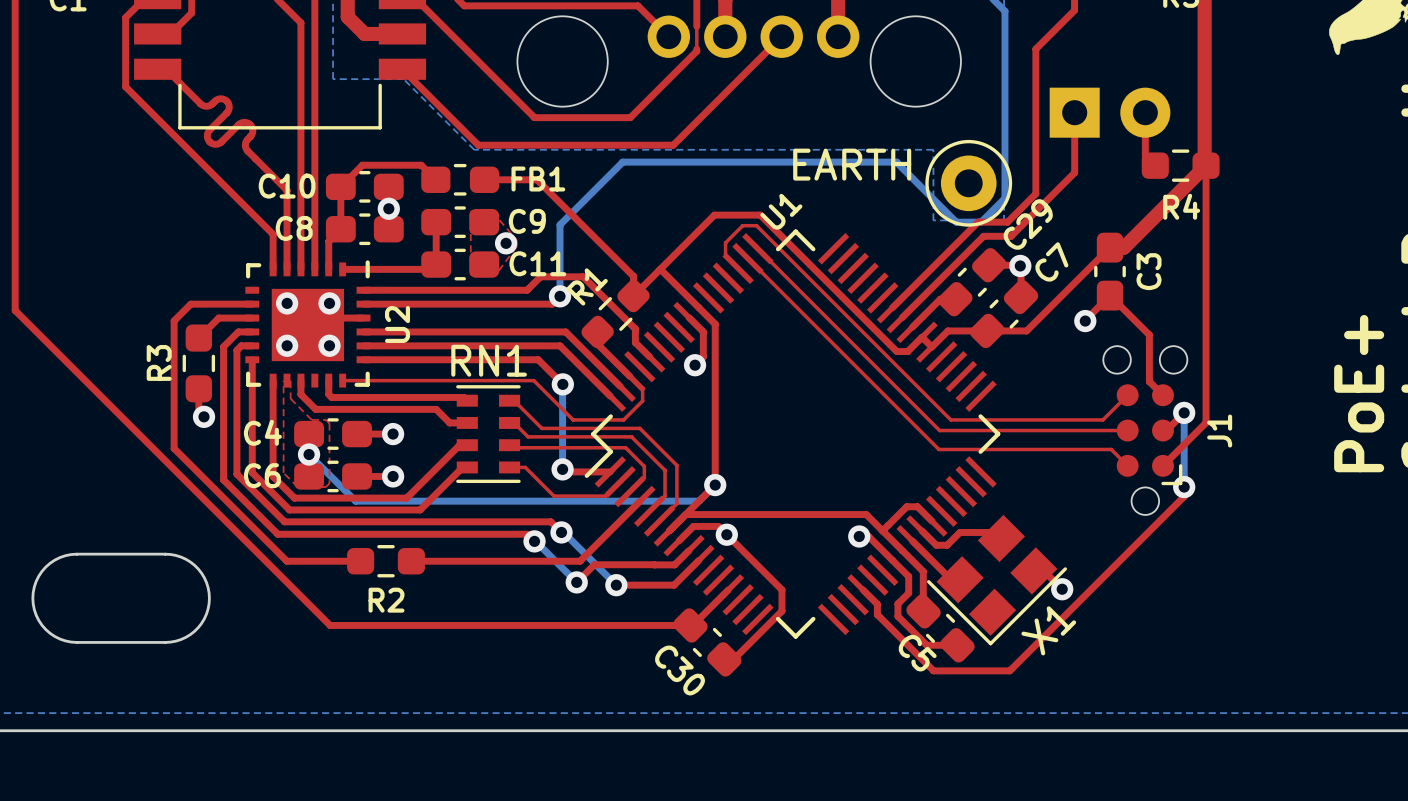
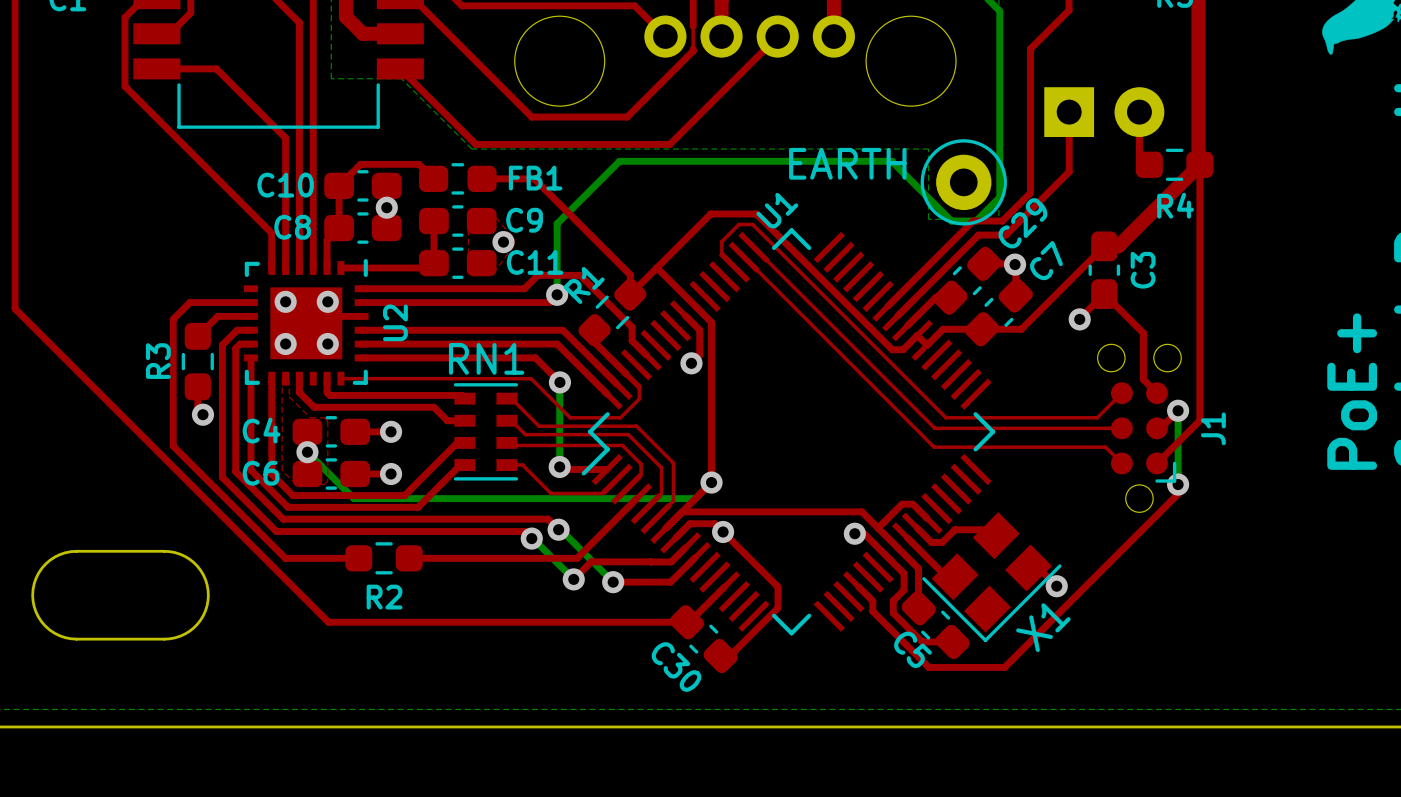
top track: (166, 69) (202, 105) (209, 105) (219, 98) (228, 102) (227, 112) (208, 132) (207, 138) (211, 143) (220, 143) (241, 123) (250, 124) (252, 131) (245, 142) (246, 149) (287, 190) -> (165, 68) (216, 68) (285, 138) (285, 189)

